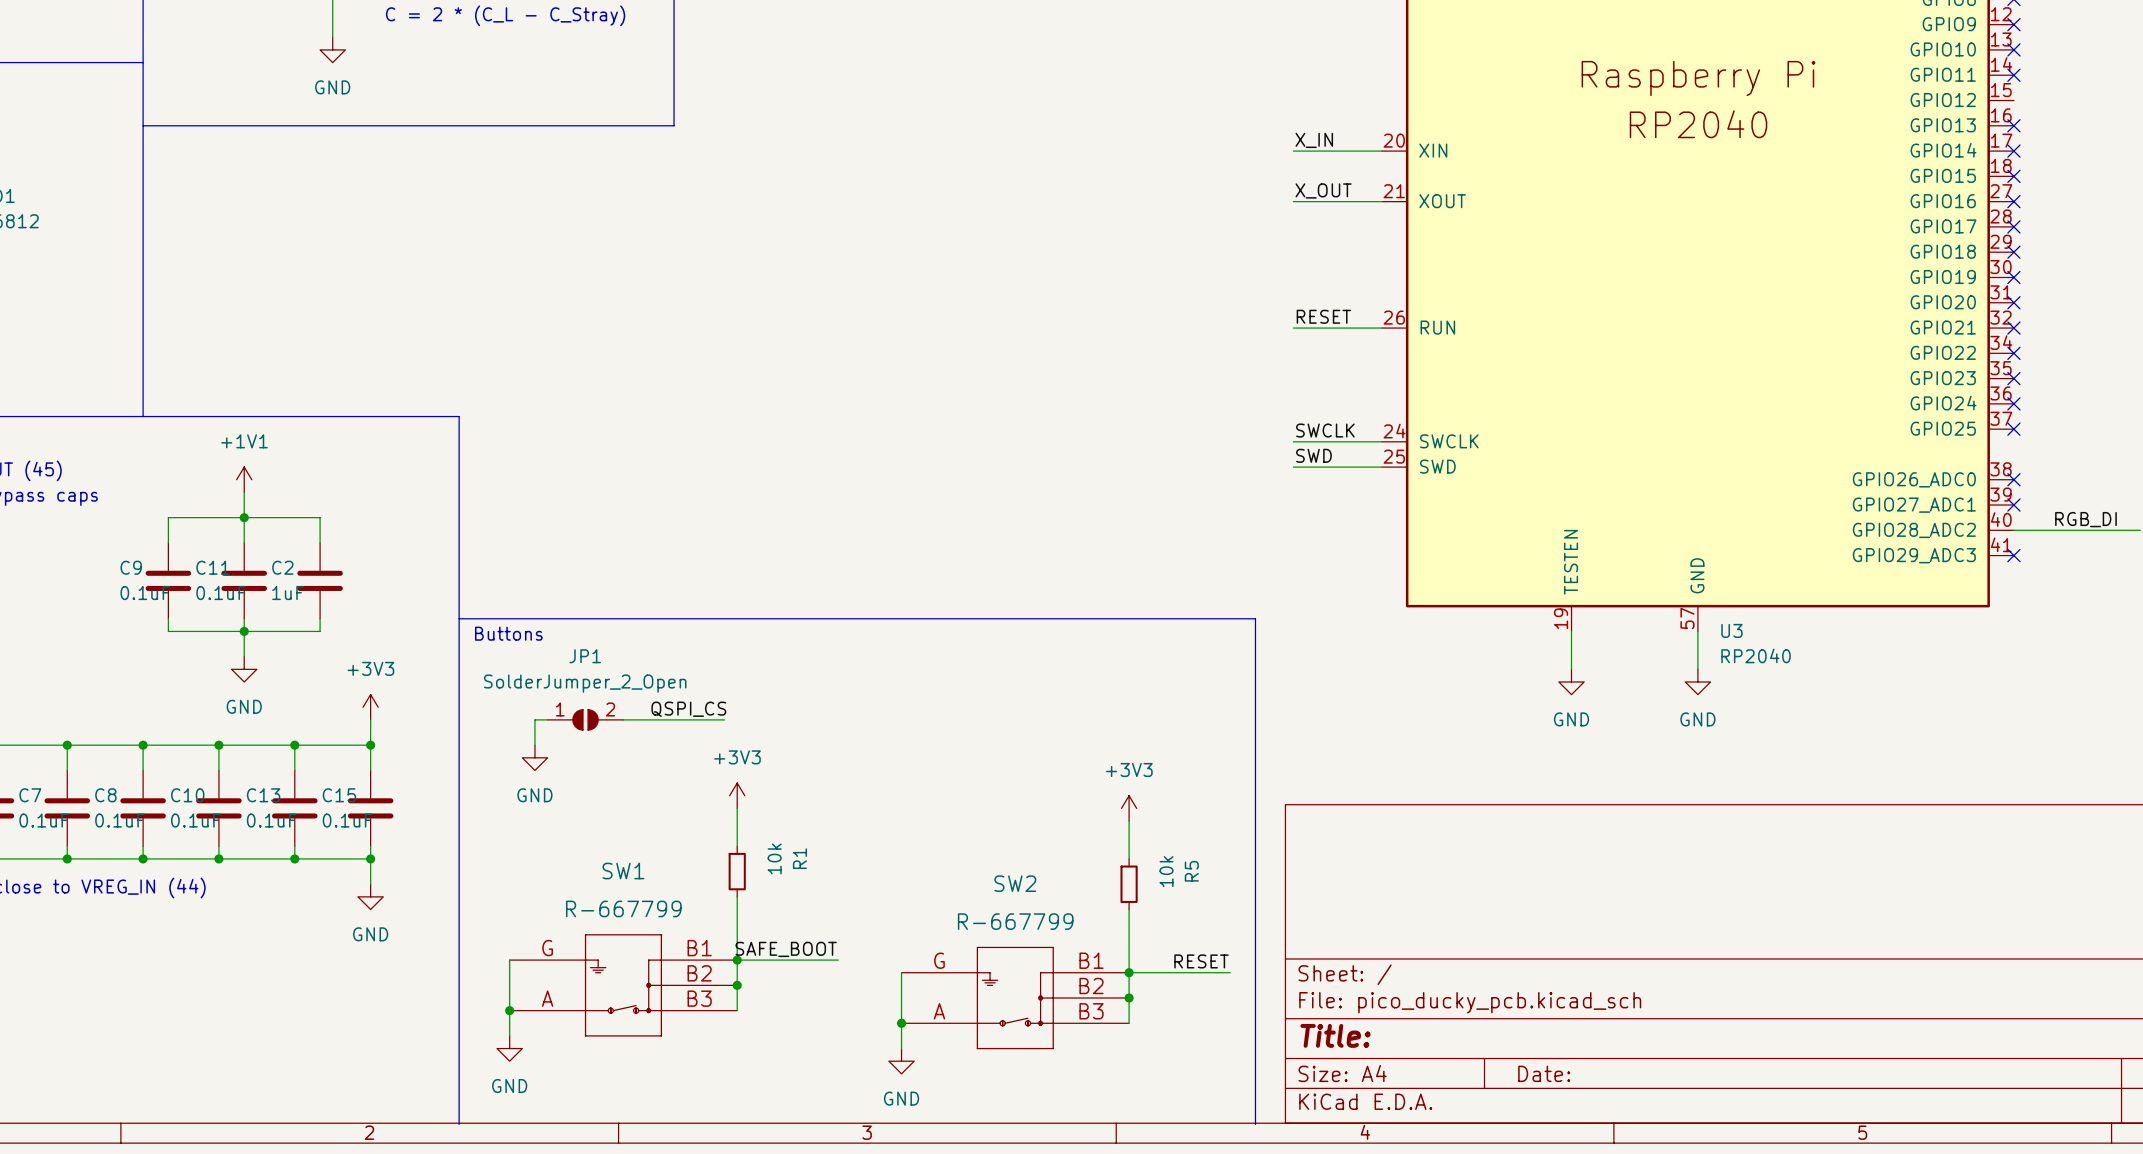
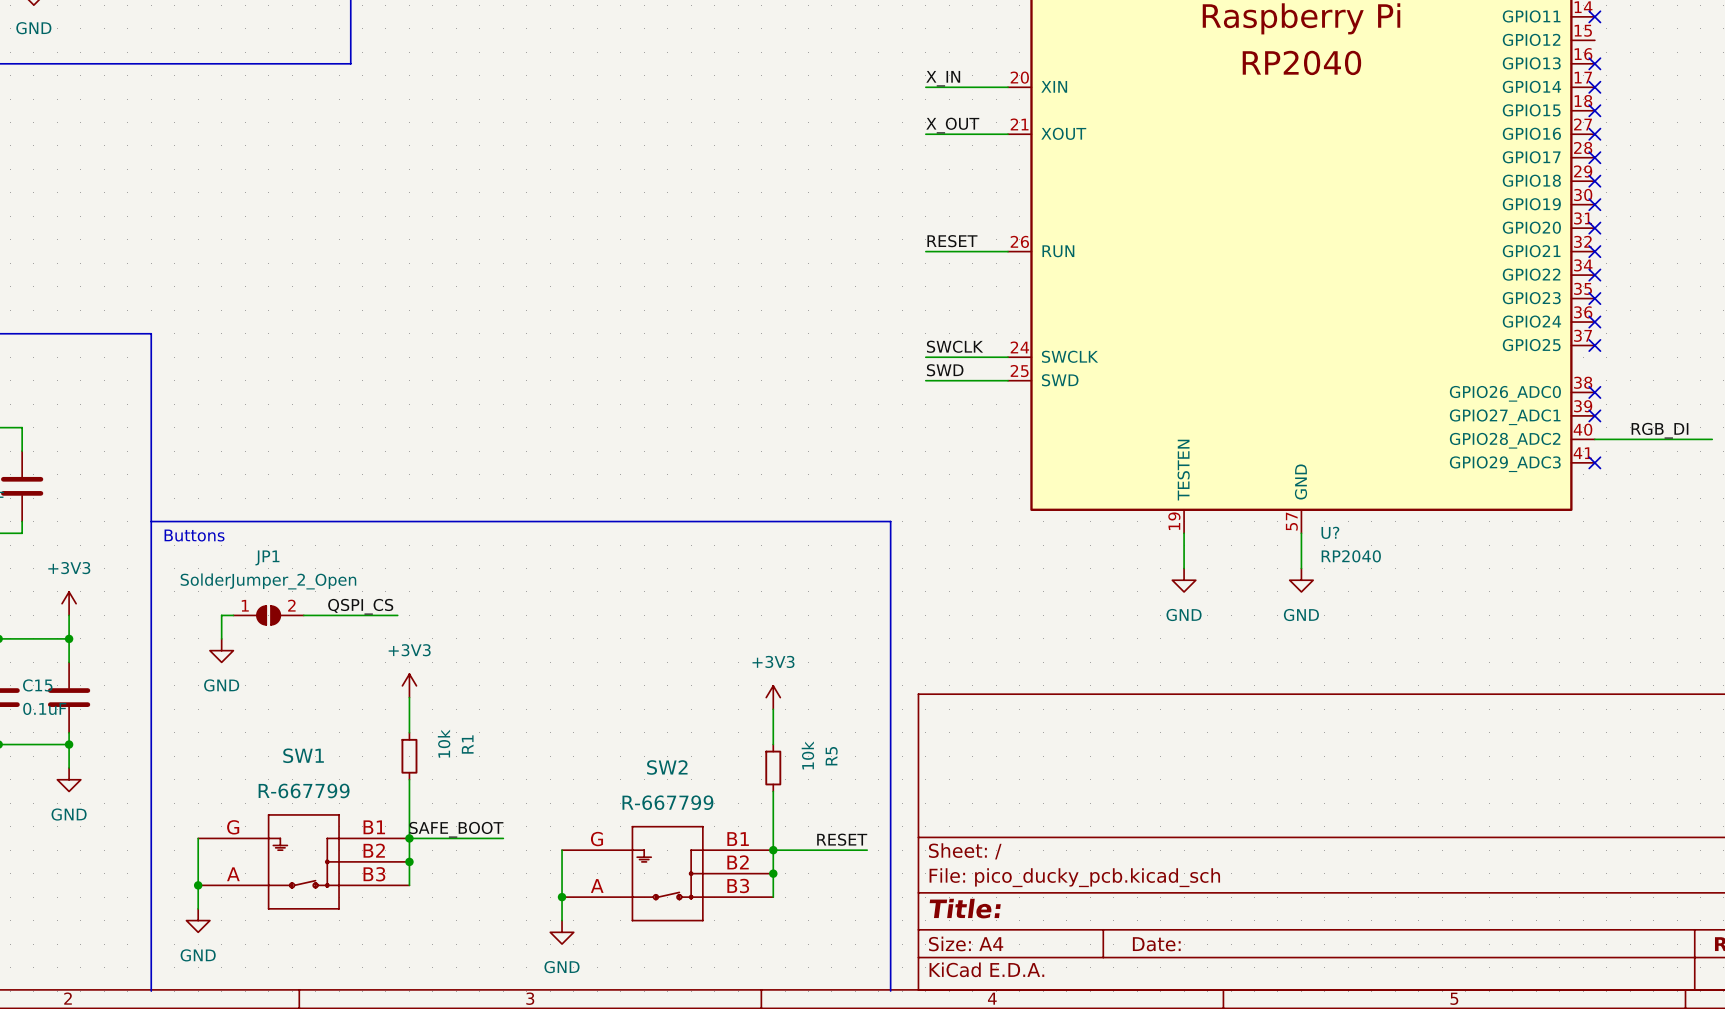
U3 name: U3 (1731, 630) -> U? (1330, 532)

